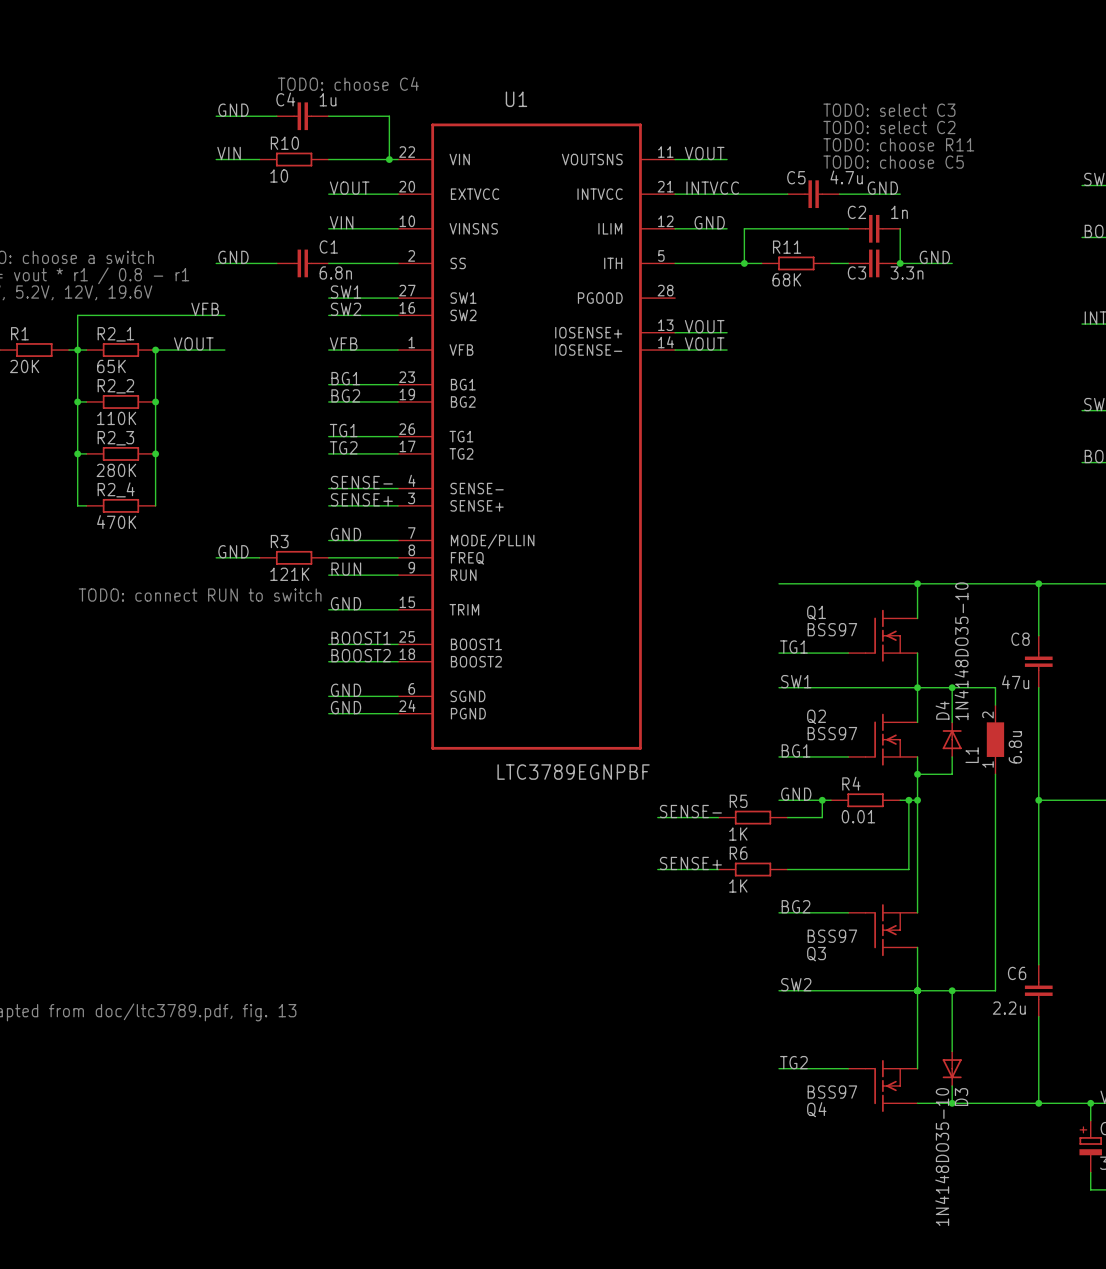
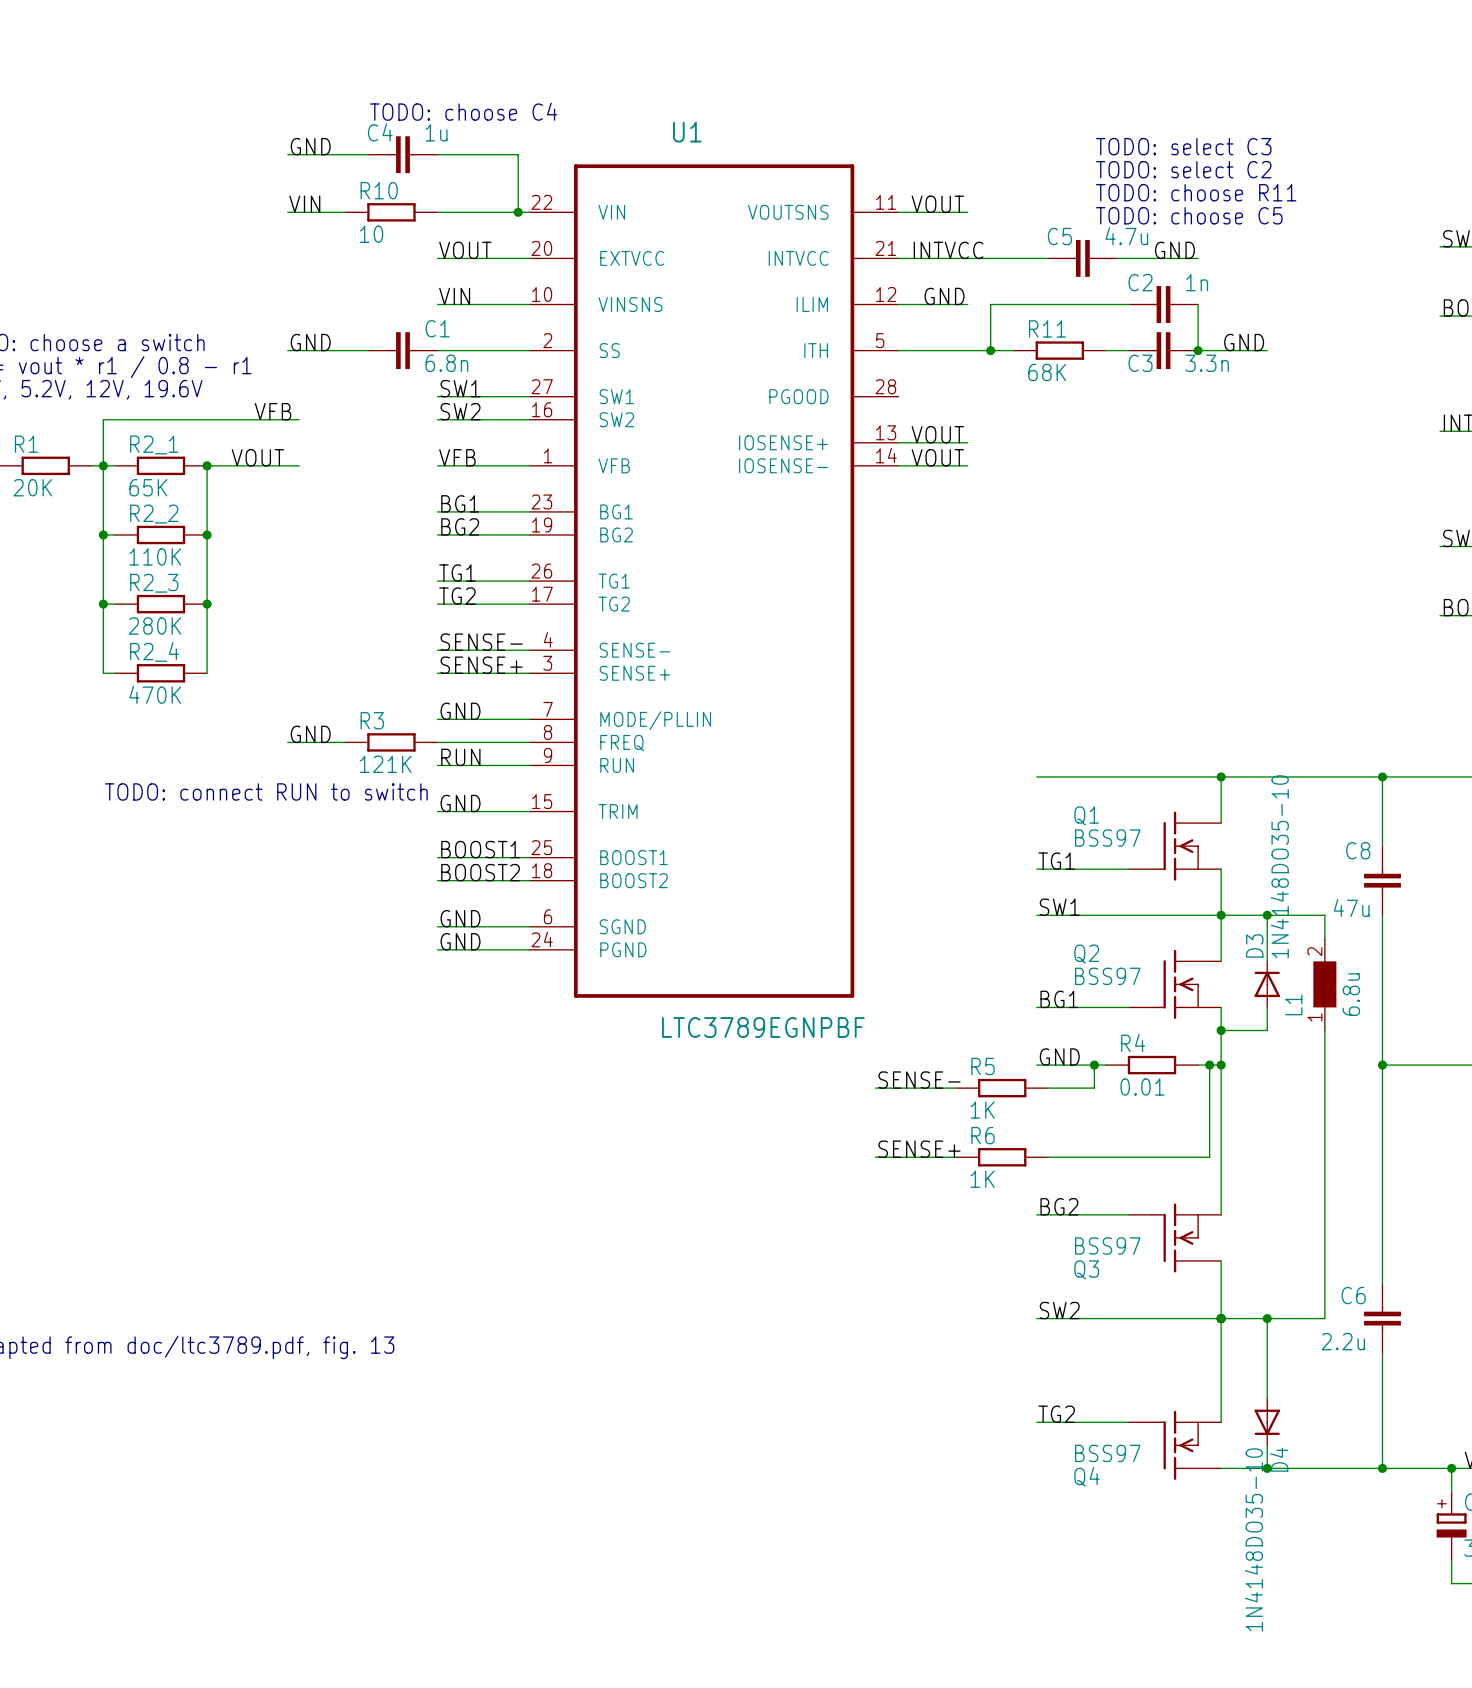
D4 name: D4 (942, 710) -> D3 (1254, 945)
D3 name: D3 (961, 1097) -> D4 (1279, 1459)

